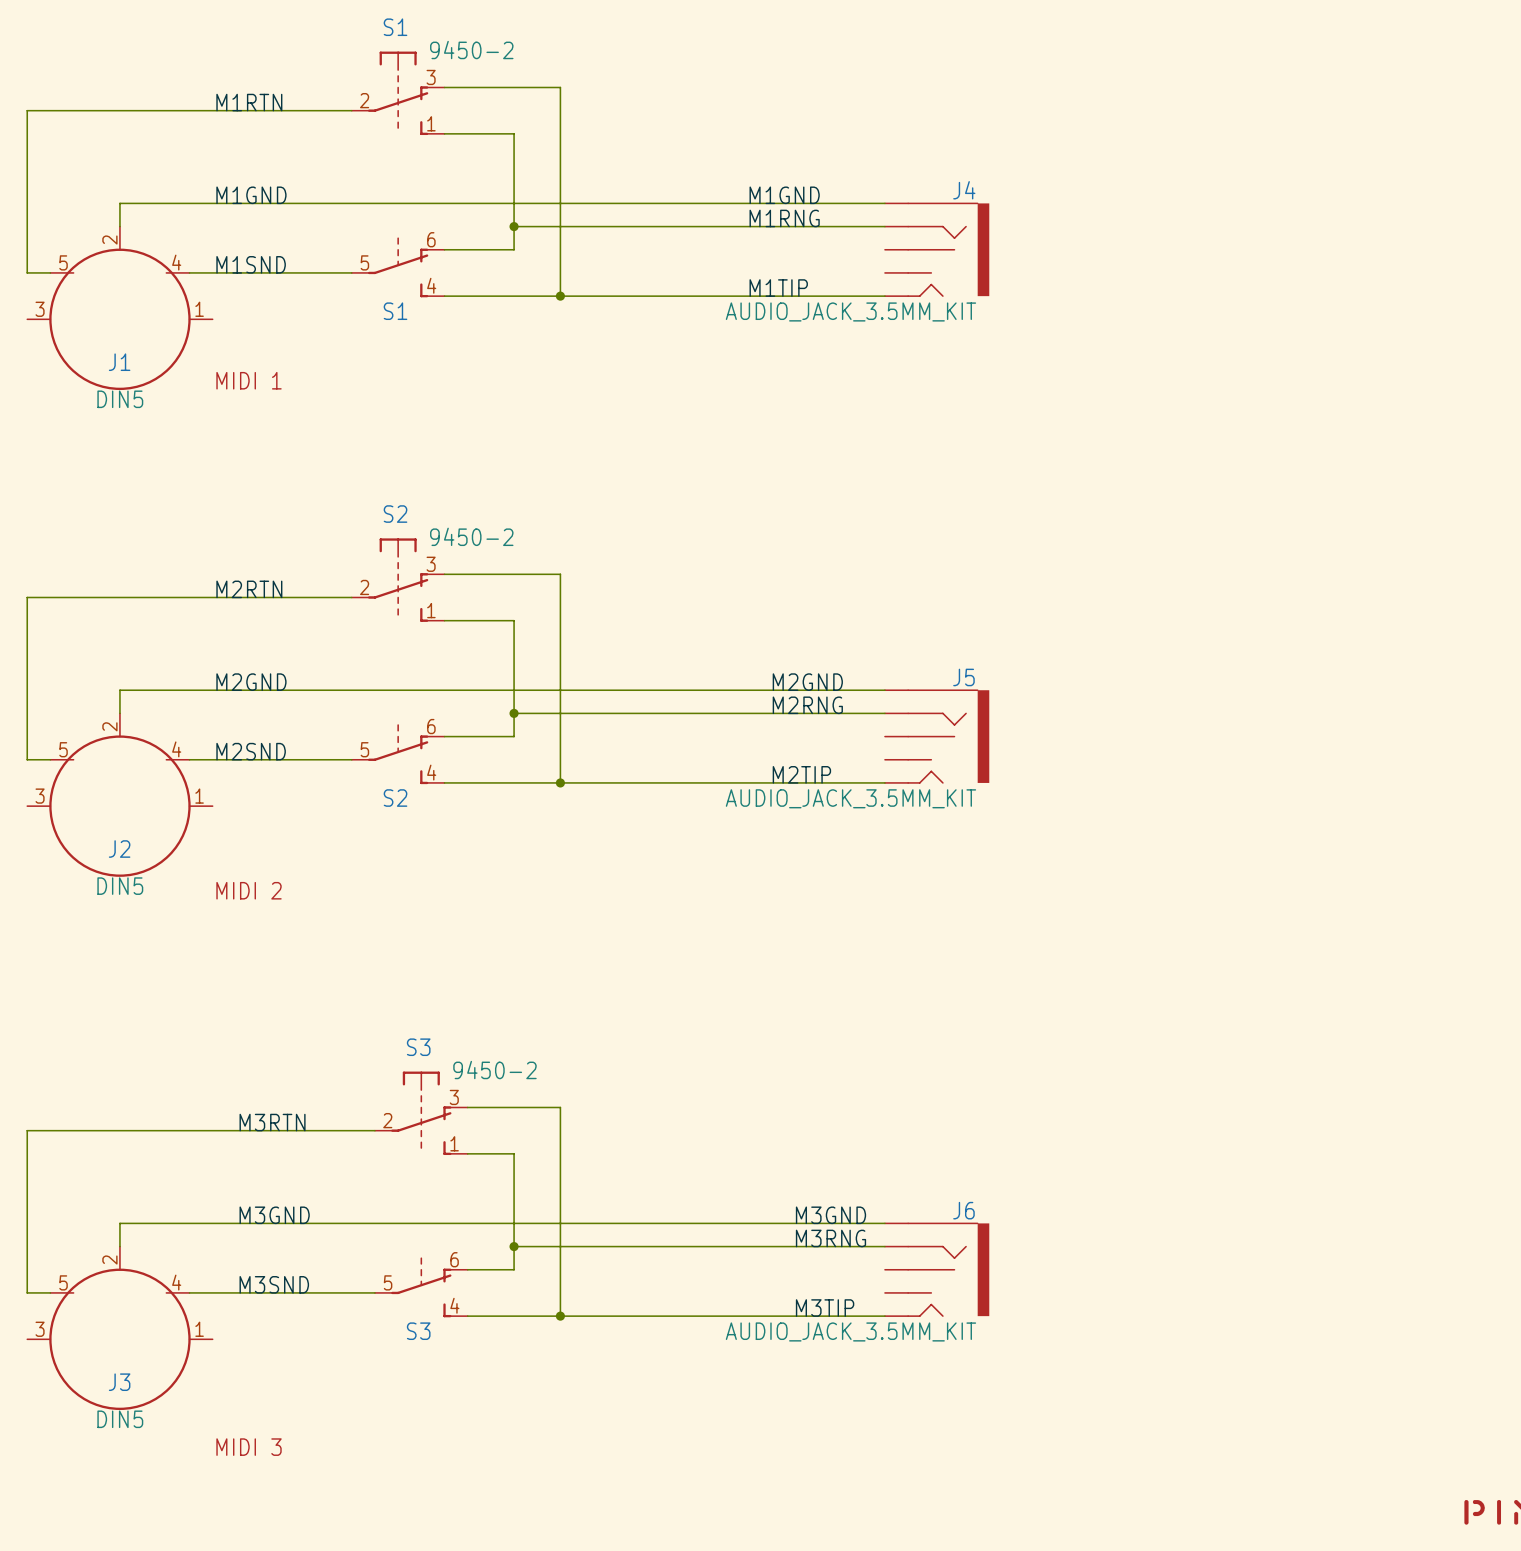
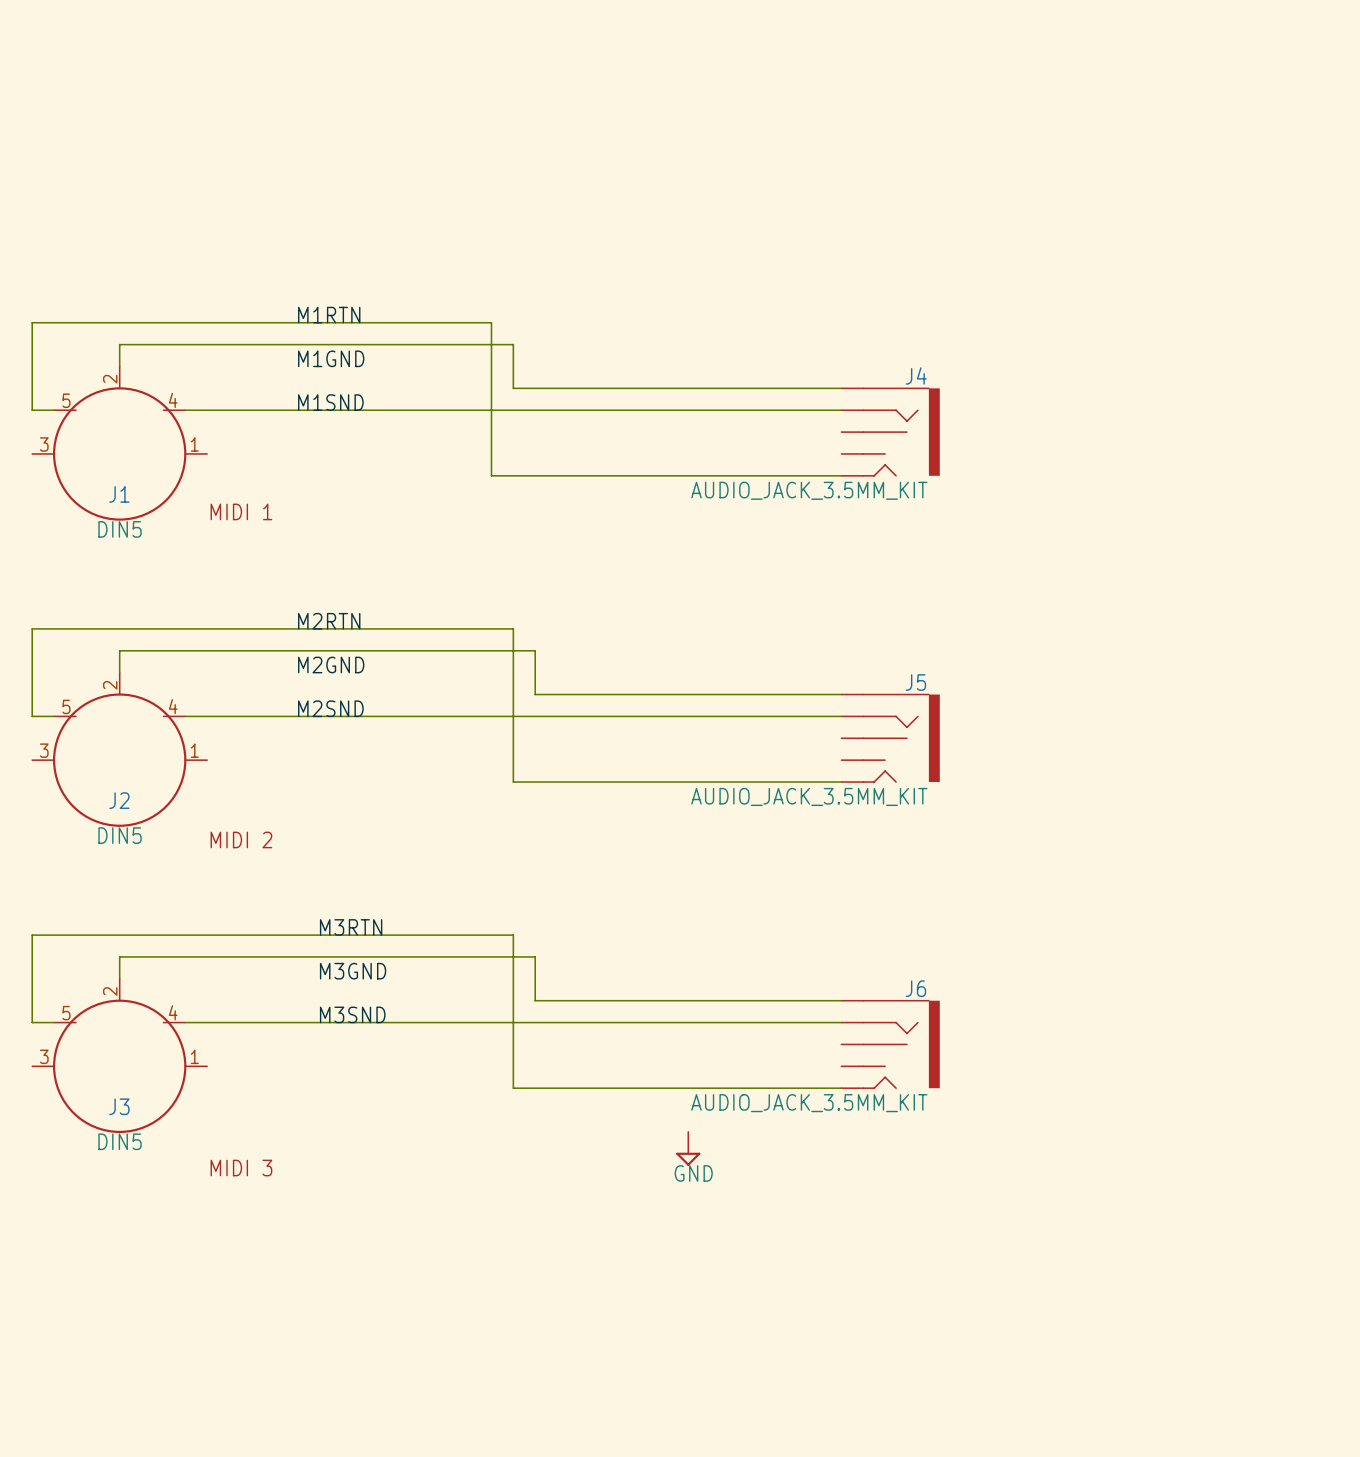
wire: (444, 87) (560, 87) (560, 296) -> none
S1: 9450-2 (398, 93) -> none
label: M1RTN (249, 102) -> none
wire: (351, 110) (27, 110) (27, 272) (50, 272) -> none
wire: (444, 133) (514, 133) (514, 249) (444, 249) -> none
label position: M1GND (251, 195) -> M1GND (331, 358)
label: M1GND (784, 195) -> none
wire: (884, 203) (119, 203) (119, 226) -> none
label: M1RNG (784, 218) -> none
wire: (514, 226) (884, 226) -> none
junction: (514, 226) -> none
J4 position: (937, 249) -> (890, 432)
label position: M1SND (251, 264) -> M1SND (330, 402)
S1: (398, 267) -> none
wire: (189, 272) (351, 272) -> none
label: M1TIP (778, 288) -> none
wire: (444, 296) (884, 296) -> none
junction: (560, 296) -> none
J1 position: (119, 308) -> (119, 443)
label: none -> M1RTN (329, 315)
text position: MIDI 1 (249, 380) -> MIDI 1 (241, 511)
wire: none -> (119, 366) (119, 344) (513, 344) (513, 388) (841, 388)
wire: none -> (54, 410) (32, 410) (32, 322) (491, 322) (491, 475) (841, 475)
wire: none -> (185, 410) (841, 410)
wire: (444, 574) (560, 574) (560, 690) (884, 690) -> none
S2: 9450-2 (398, 580) -> none
label position: M2RTN (249, 589) -> M2RTN (329, 621)
wire: (351, 597) (27, 597) (27, 667) -> (841, 782) (513, 782) (513, 628) (32, 628)
wire: (444, 620) (514, 620) (514, 736) (444, 736) -> none
label position: M2GND (251, 682) -> M2GND (331, 665)
label: M2GND (807, 682) -> none
label: M2RNG (807, 705) -> none
wire: (514, 713) (884, 713) -> none
junction: (514, 713) -> none
wire: (560, 736) (560, 782) -> (535, 694) (841, 694)
J5 position: (937, 736) -> (890, 738)
label position: M2SND (251, 751) -> M2SND (330, 708)
S2: (398, 754) -> none
wire: none -> (338, 716) (841, 716)
label: M2TIP (801, 774) -> none
wire: (444, 782) (884, 782) -> none
junction: (560, 782) -> none
wire: none -> (119, 978) (119, 956) (535, 956) (535, 1000) (841, 1000)
label: none -> M3SND (352, 1014)
wire: none -> (54, 1022) (32, 1022) (32, 935) (513, 935) (513, 1088) (841, 1088)
wire: none -> (185, 1022) (841, 1022)
wire: (467, 1107) (560, 1107) (560, 1316) -> none
S3: 9450-2 (421, 1113) -> none
label position: M3RTN (272, 1122) -> M3RTN (351, 927)
wire: (374, 1130) (27, 1130) (27, 1292) (50, 1292) -> none
wire: (467, 1153) (514, 1153) (514, 1269) (467, 1269) -> none
label position: M3GND (274, 1215) -> M3GND (353, 971)
label: M3GND (830, 1215) -> none
power symbol: none -> GND (688, 1148)
wire: (884, 1223) (119, 1223) (119, 1246) -> none
label: M3RNG (830, 1238) -> none
wire: (514, 1246) (884, 1246) -> none
junction: (514, 1246) -> none
J6 position: (937, 1269) -> (890, 1044)
label: M3SND (274, 1284) -> none
S3: (421, 1287) -> none
wire: (189, 1292) (374, 1292) -> none
label: M3TIP (825, 1308) -> none
wire: (467, 1316) (884, 1316) -> none
junction: (560, 1316) -> none
J3 position: (119, 1328) -> (119, 1055)
text position: MIDI 3 (249, 1447) -> MIDI 3 (241, 1168)

